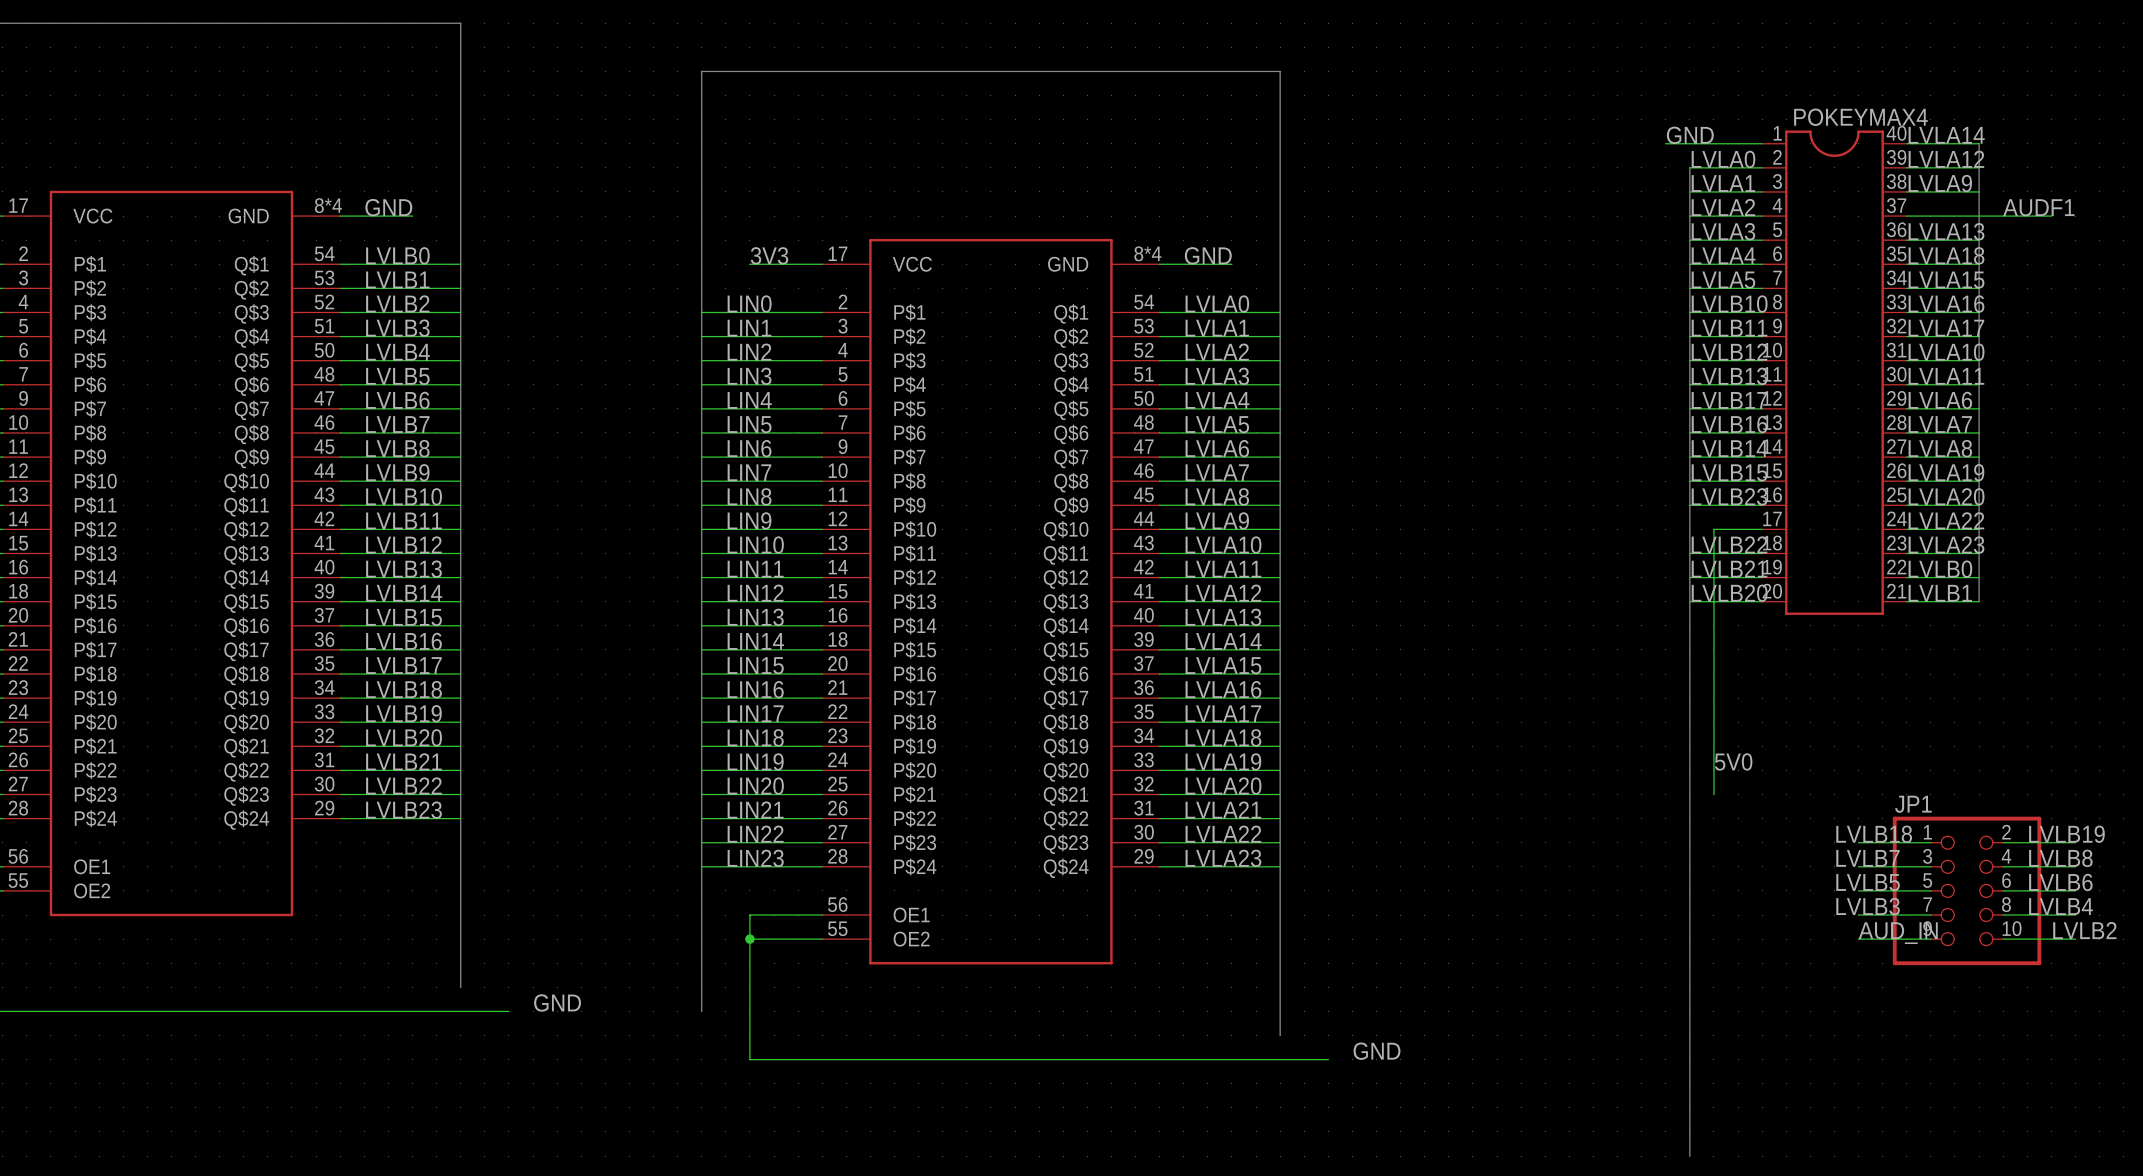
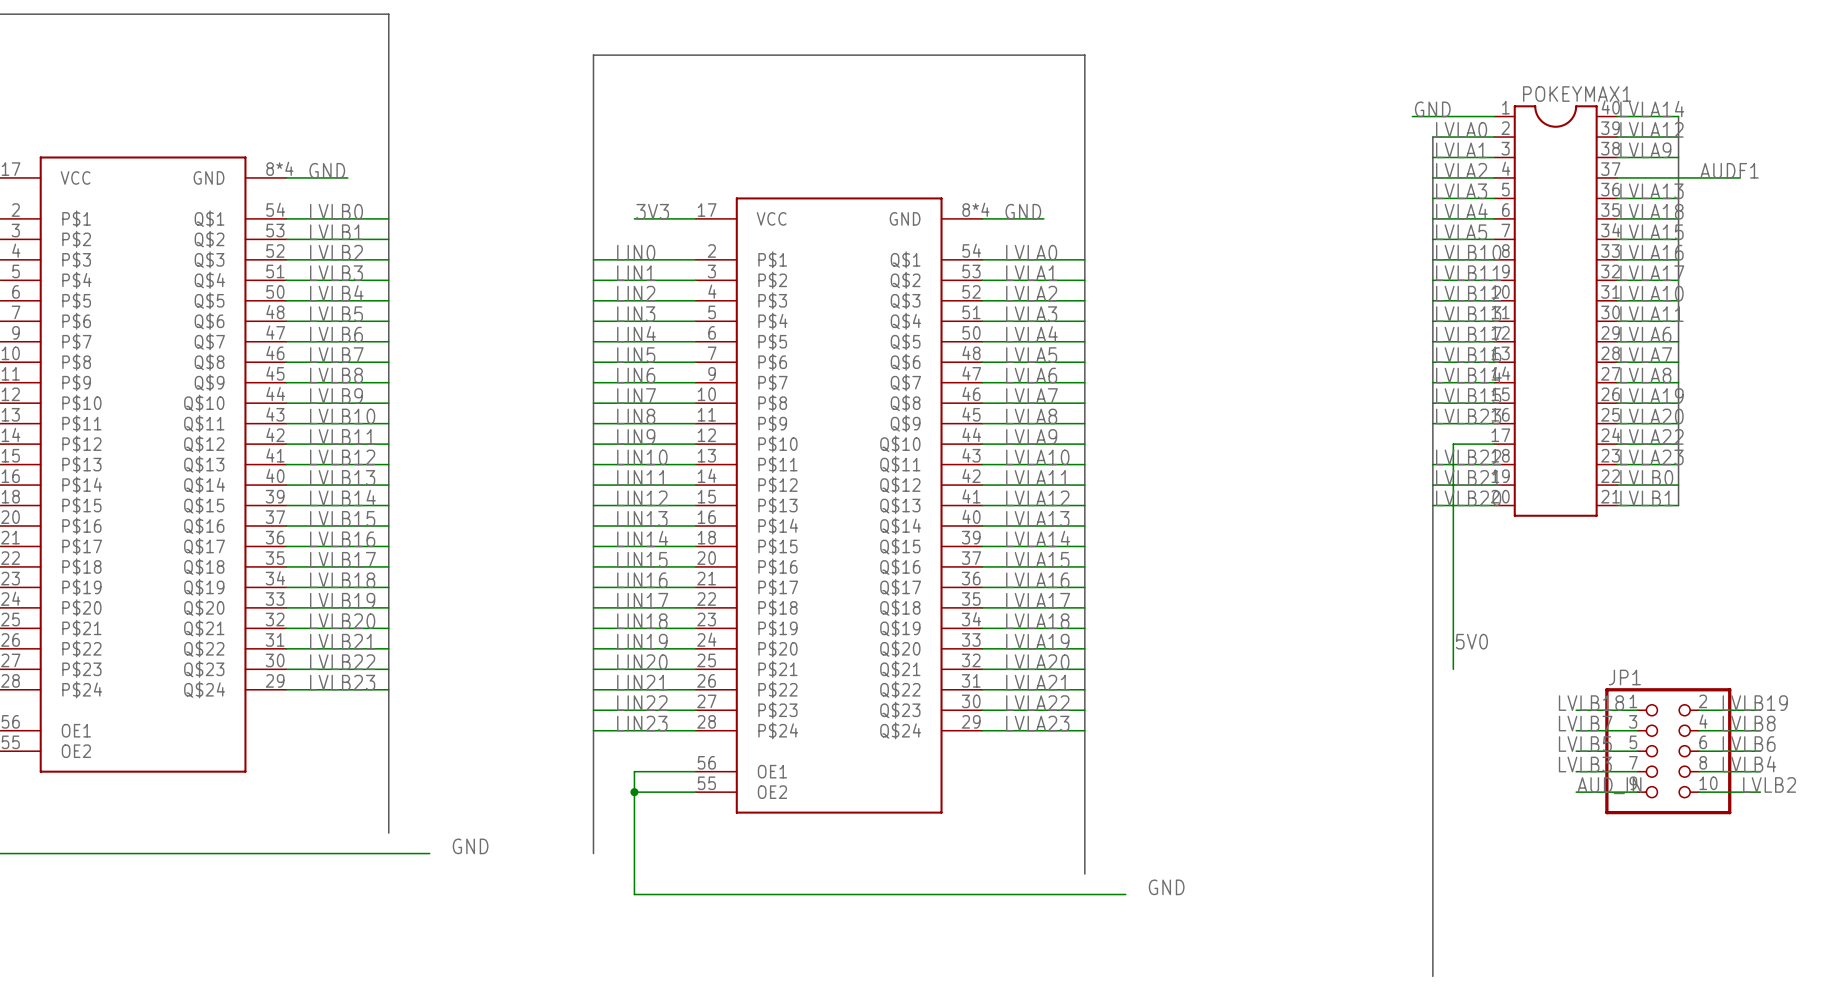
POKEYMAX4 name: POKEYMAX4 (1860, 117) -> POKEYMAX1 (1577, 94)

